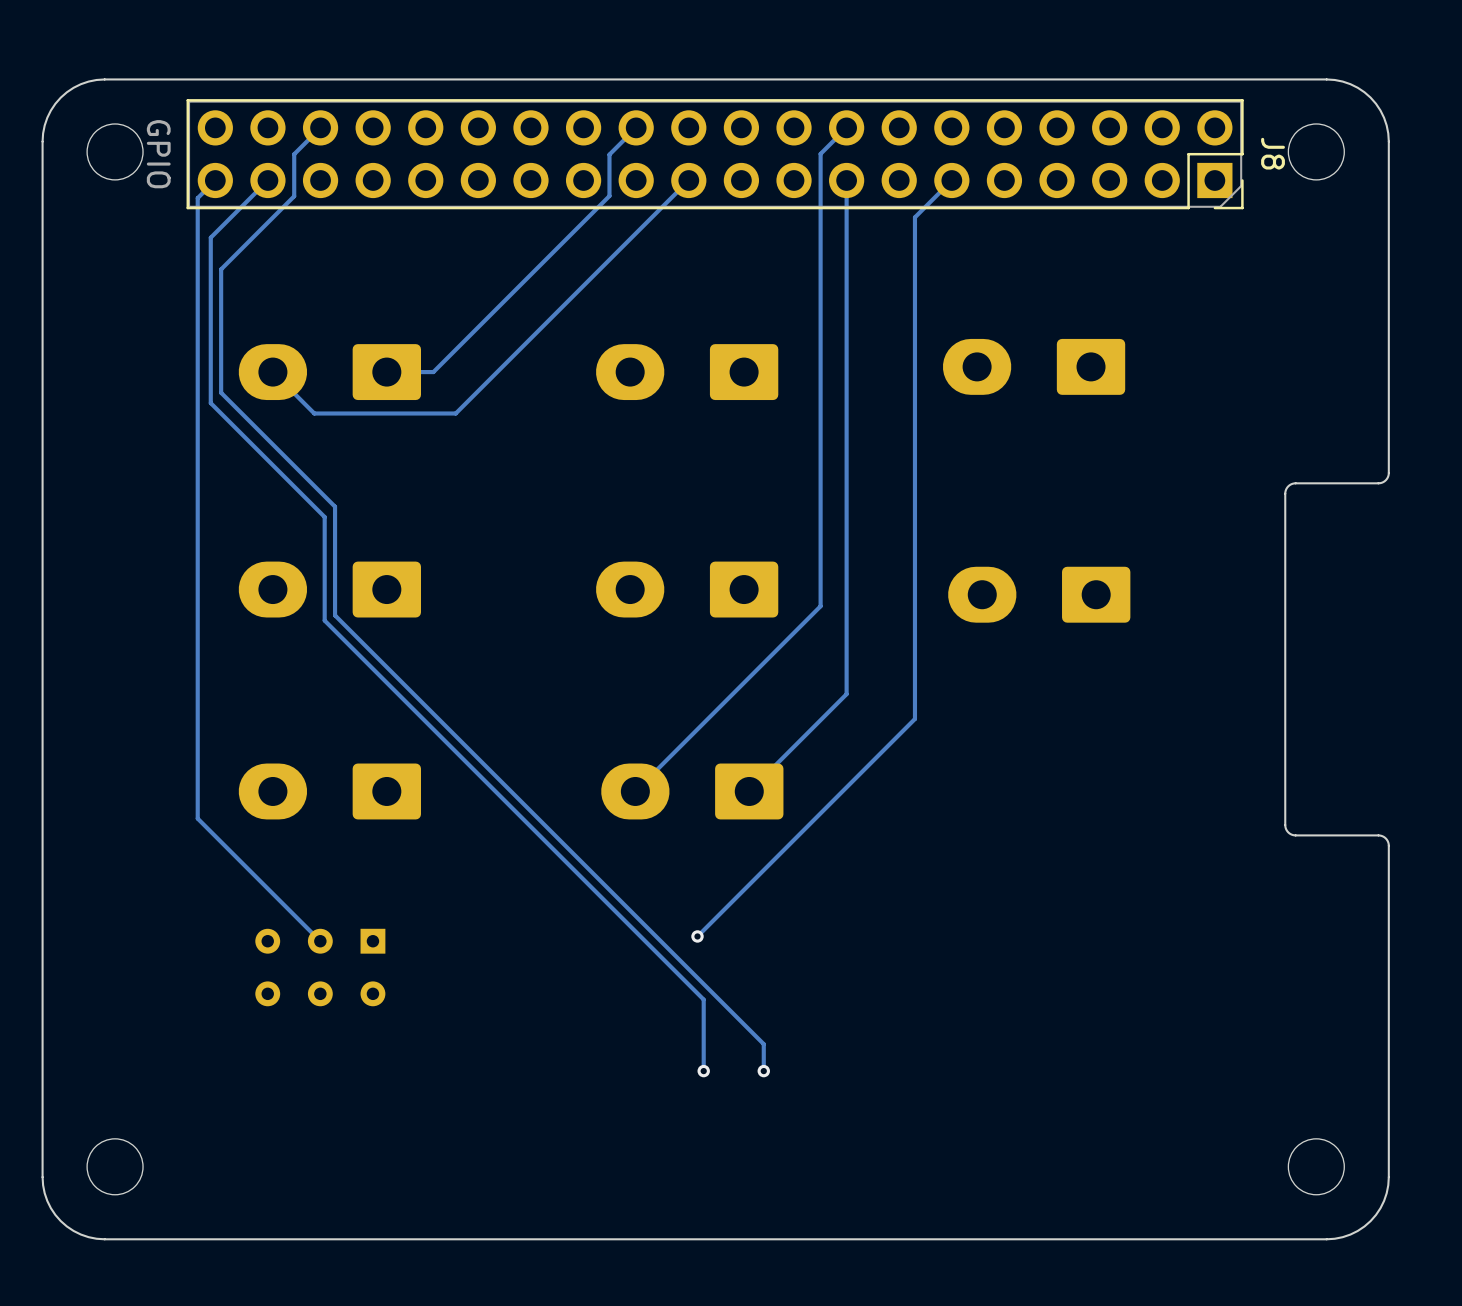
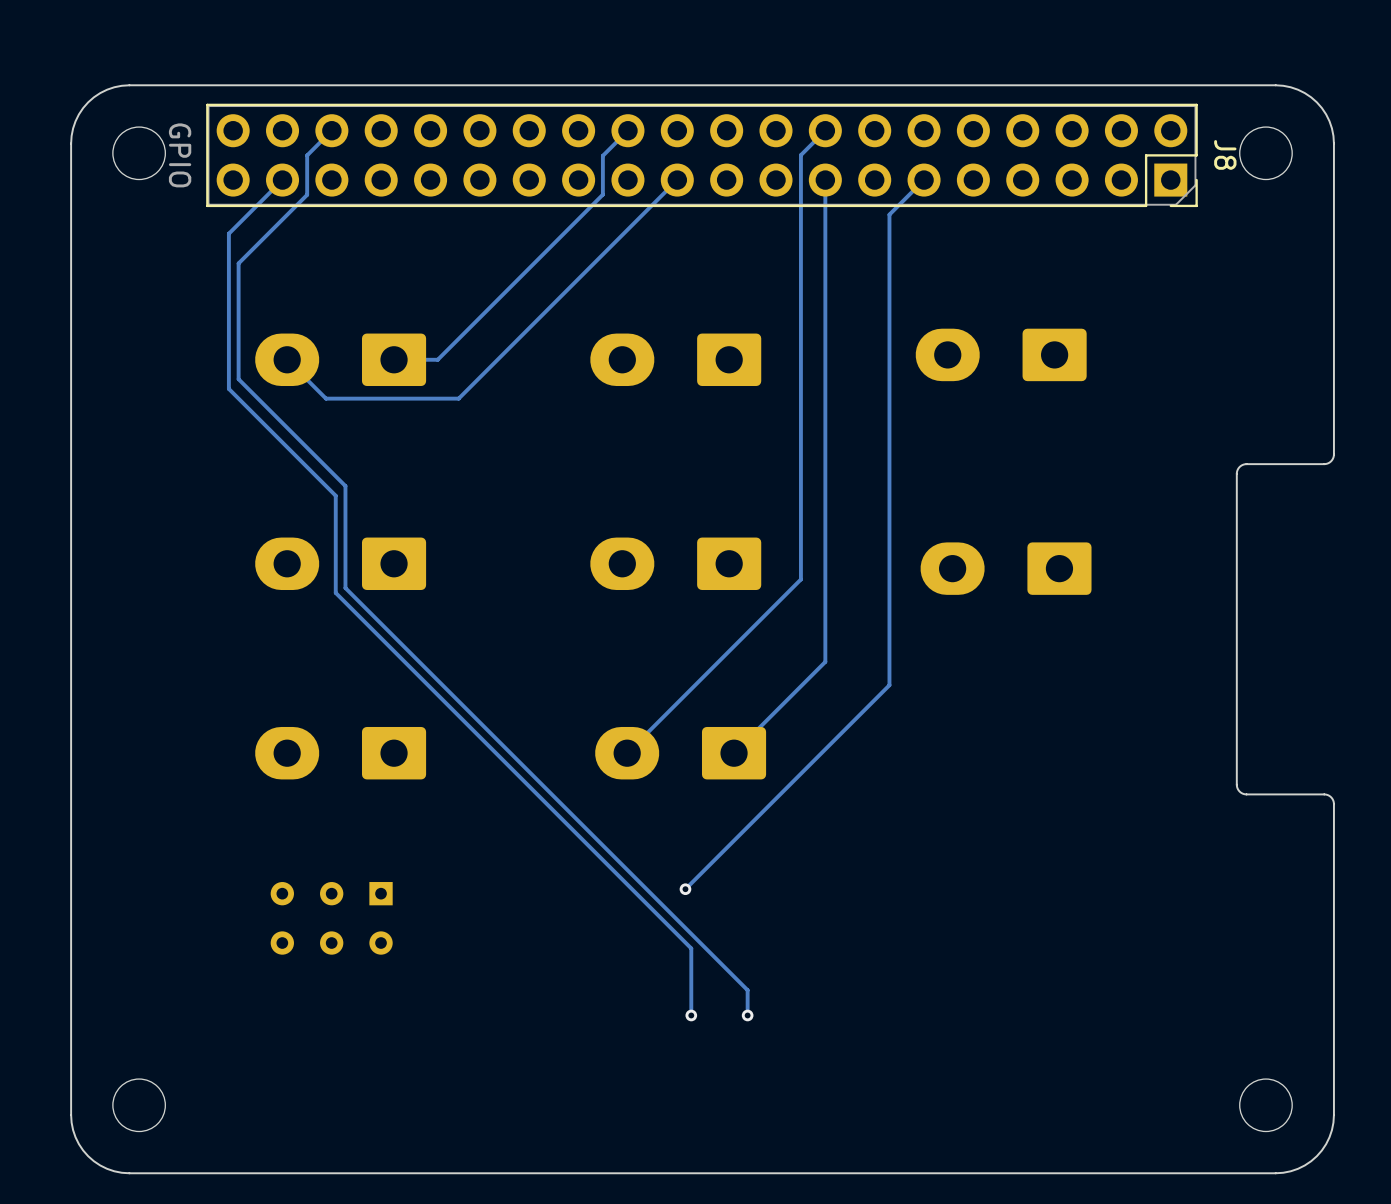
track: (215, 180) (197, 198) (197, 818) (320, 941) -> none

